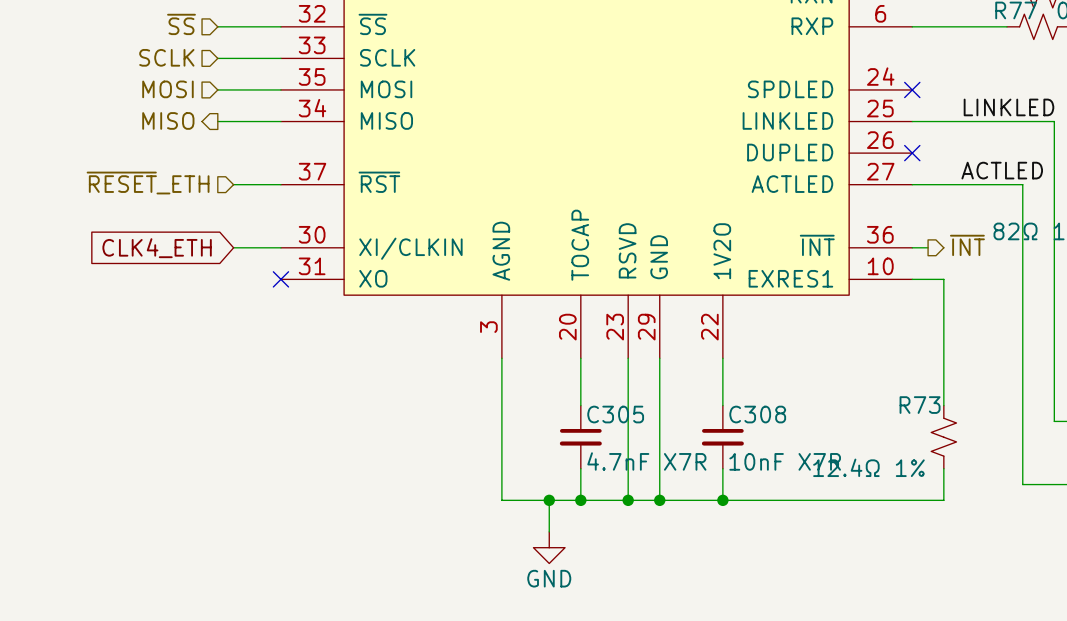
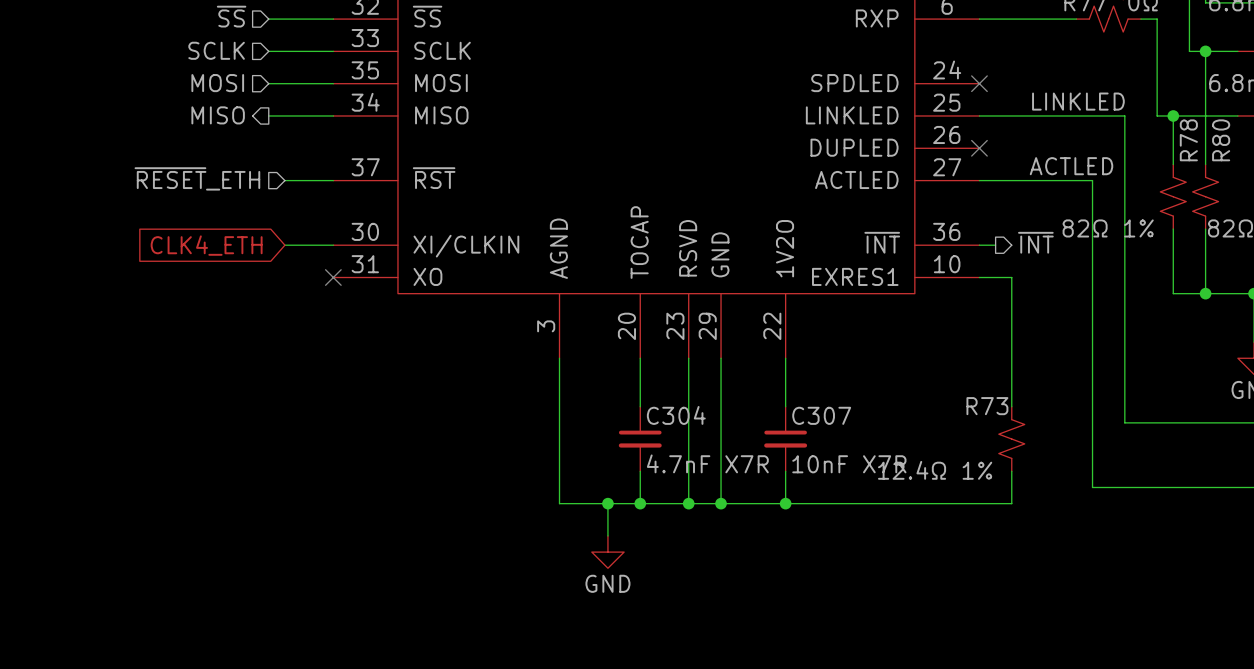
C305 name: C305 (615, 414) -> C304 (676, 415)
C308 name: C308 (757, 414) -> C307 (821, 415)

